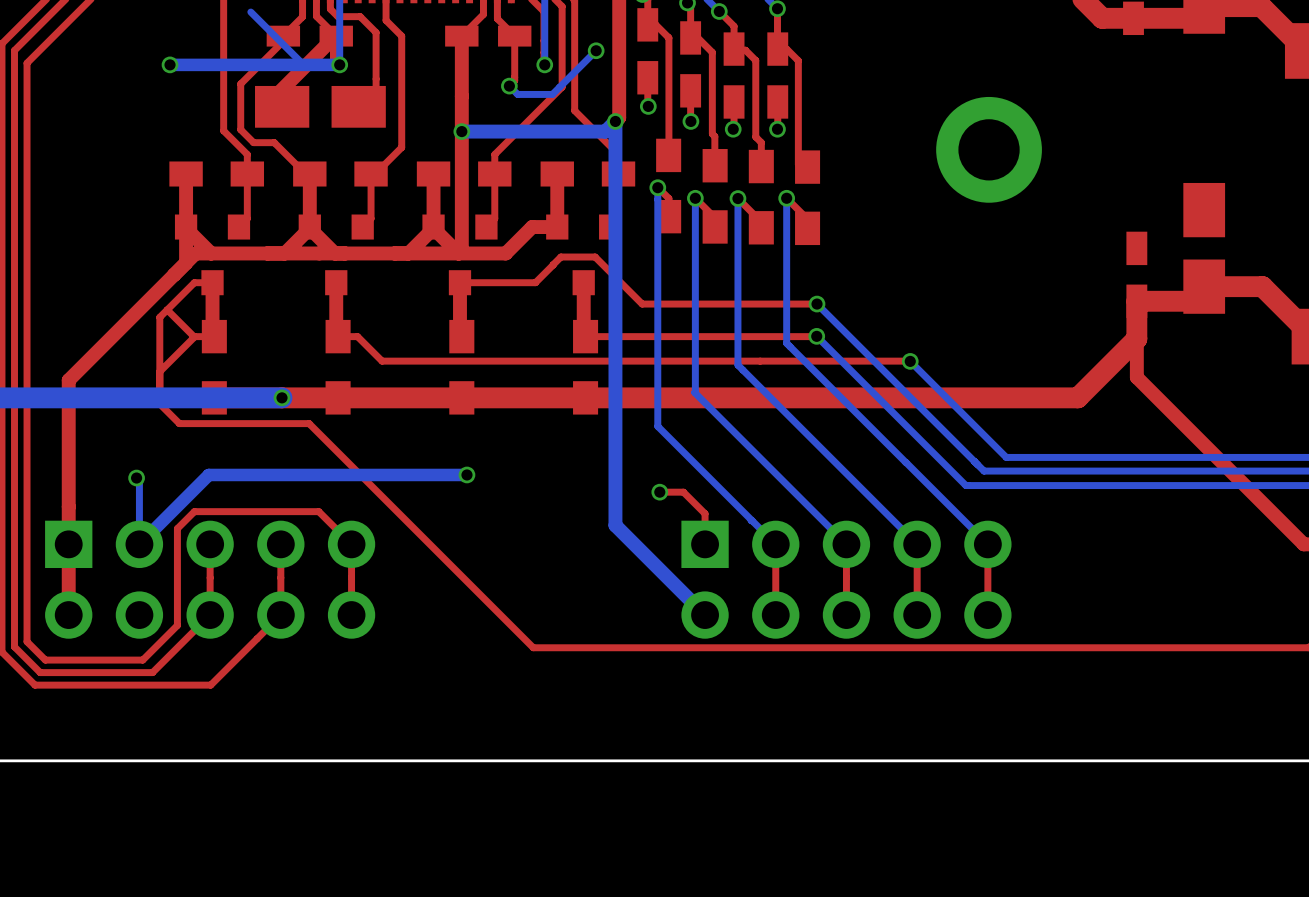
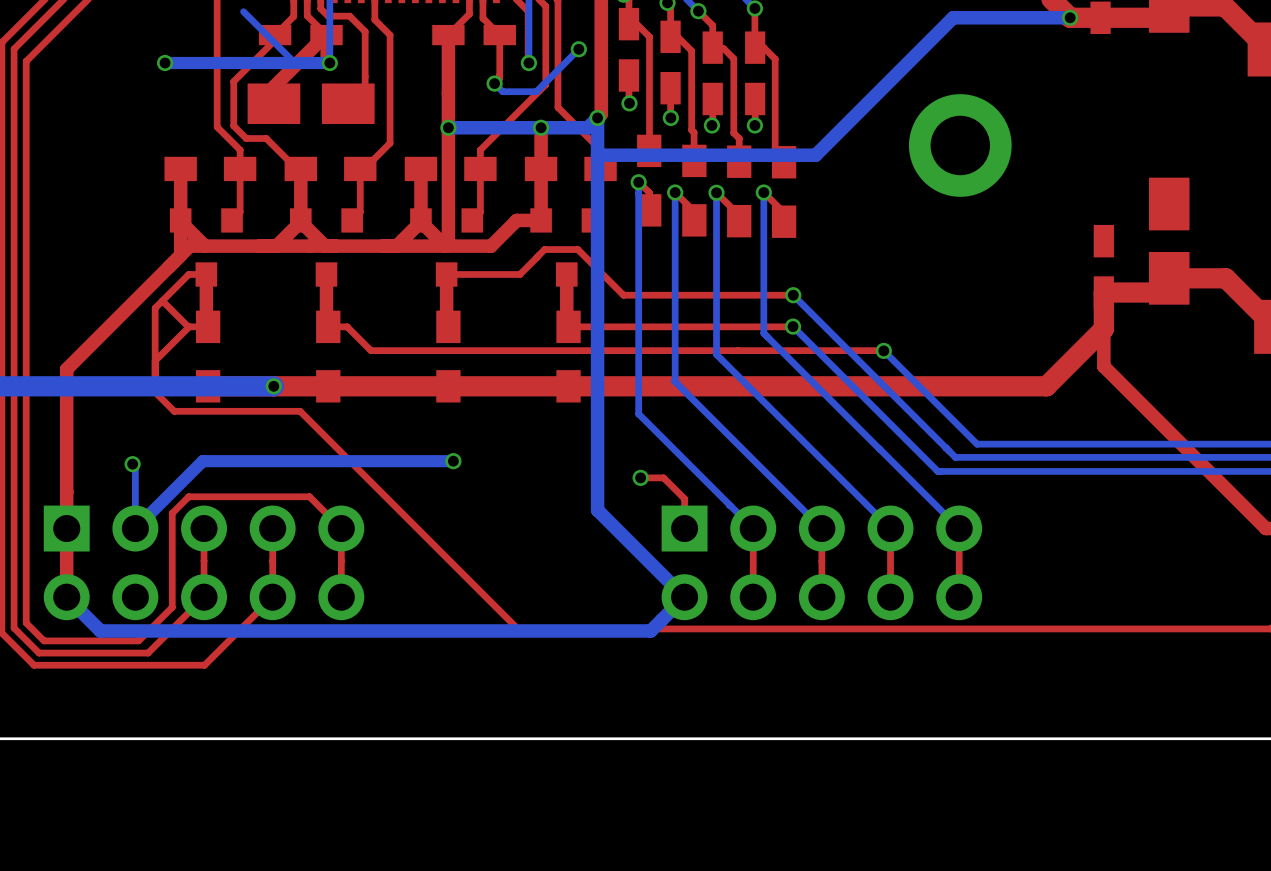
bottom track: none -> (1070, 17) (953, 17) (815, 155) (597, 155)
via: none -> (1070, 17)
top track: none -> (541, 127) (541, 168)
via: none -> (541, 127)
bottom track: none -> (684, 597) (650, 630) (100, 630) (66, 597)

